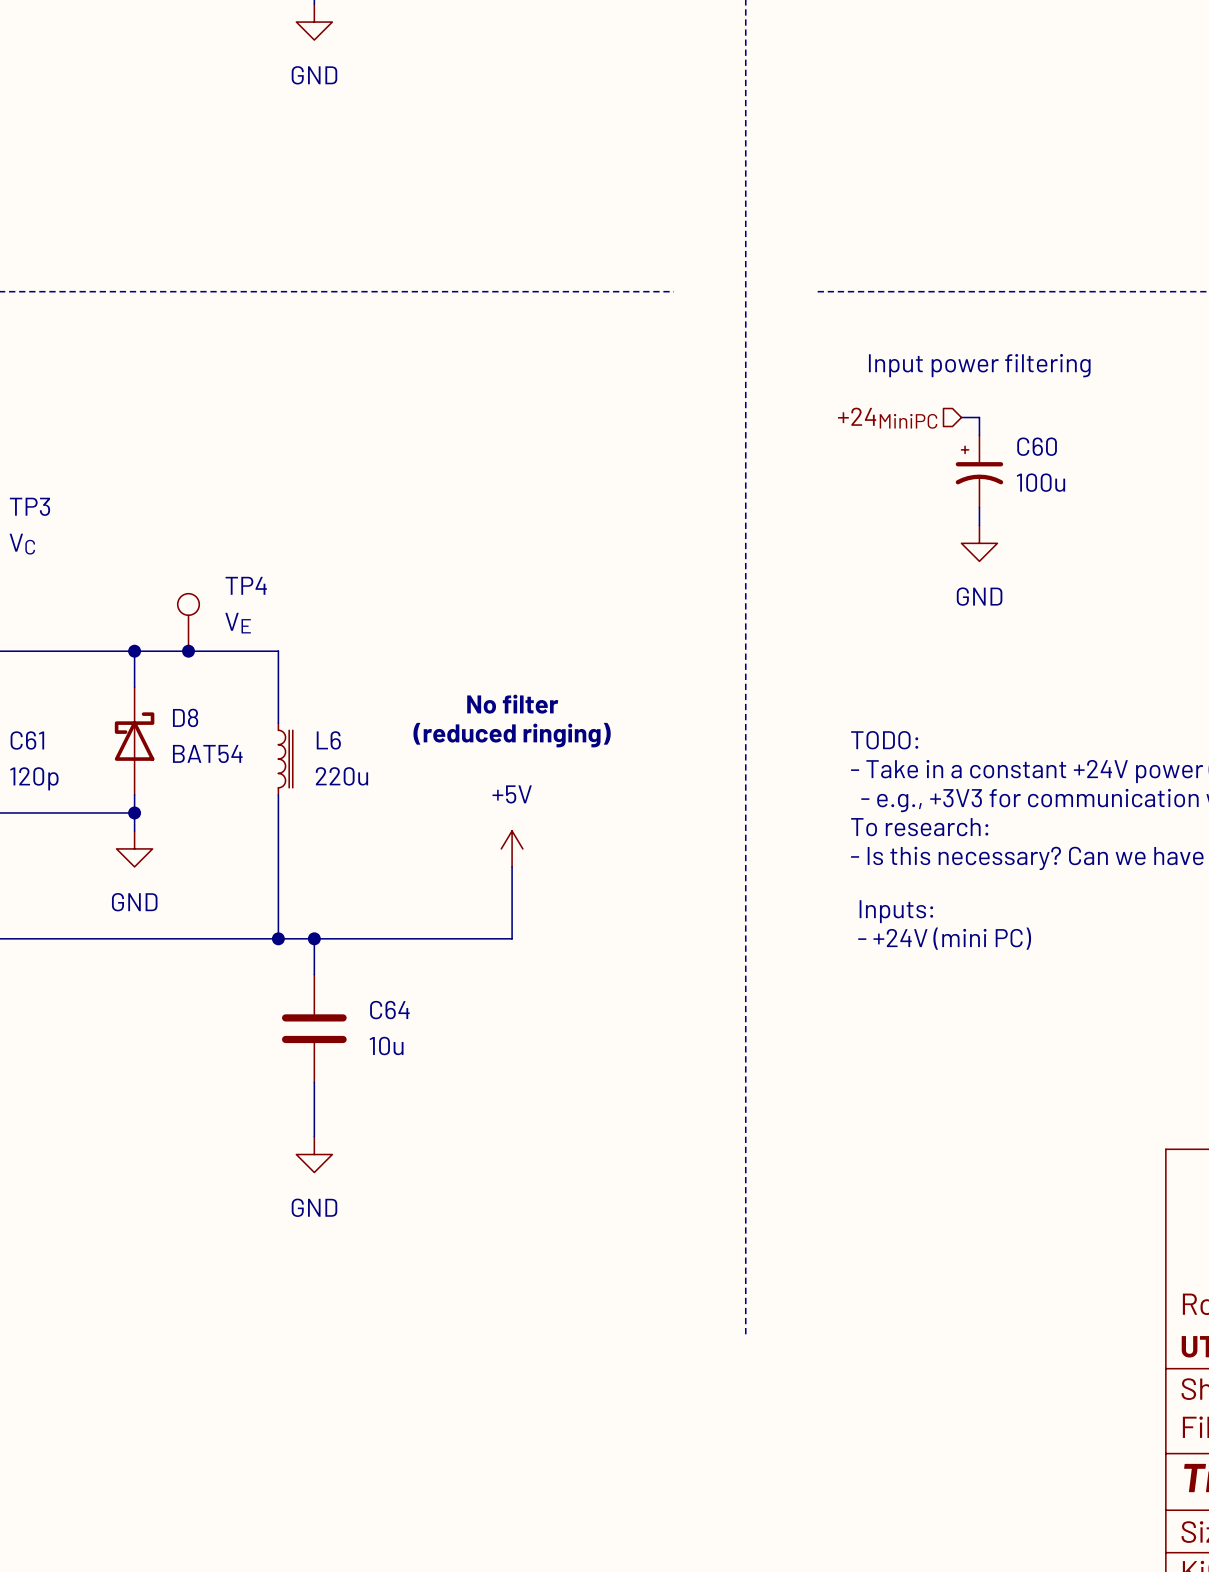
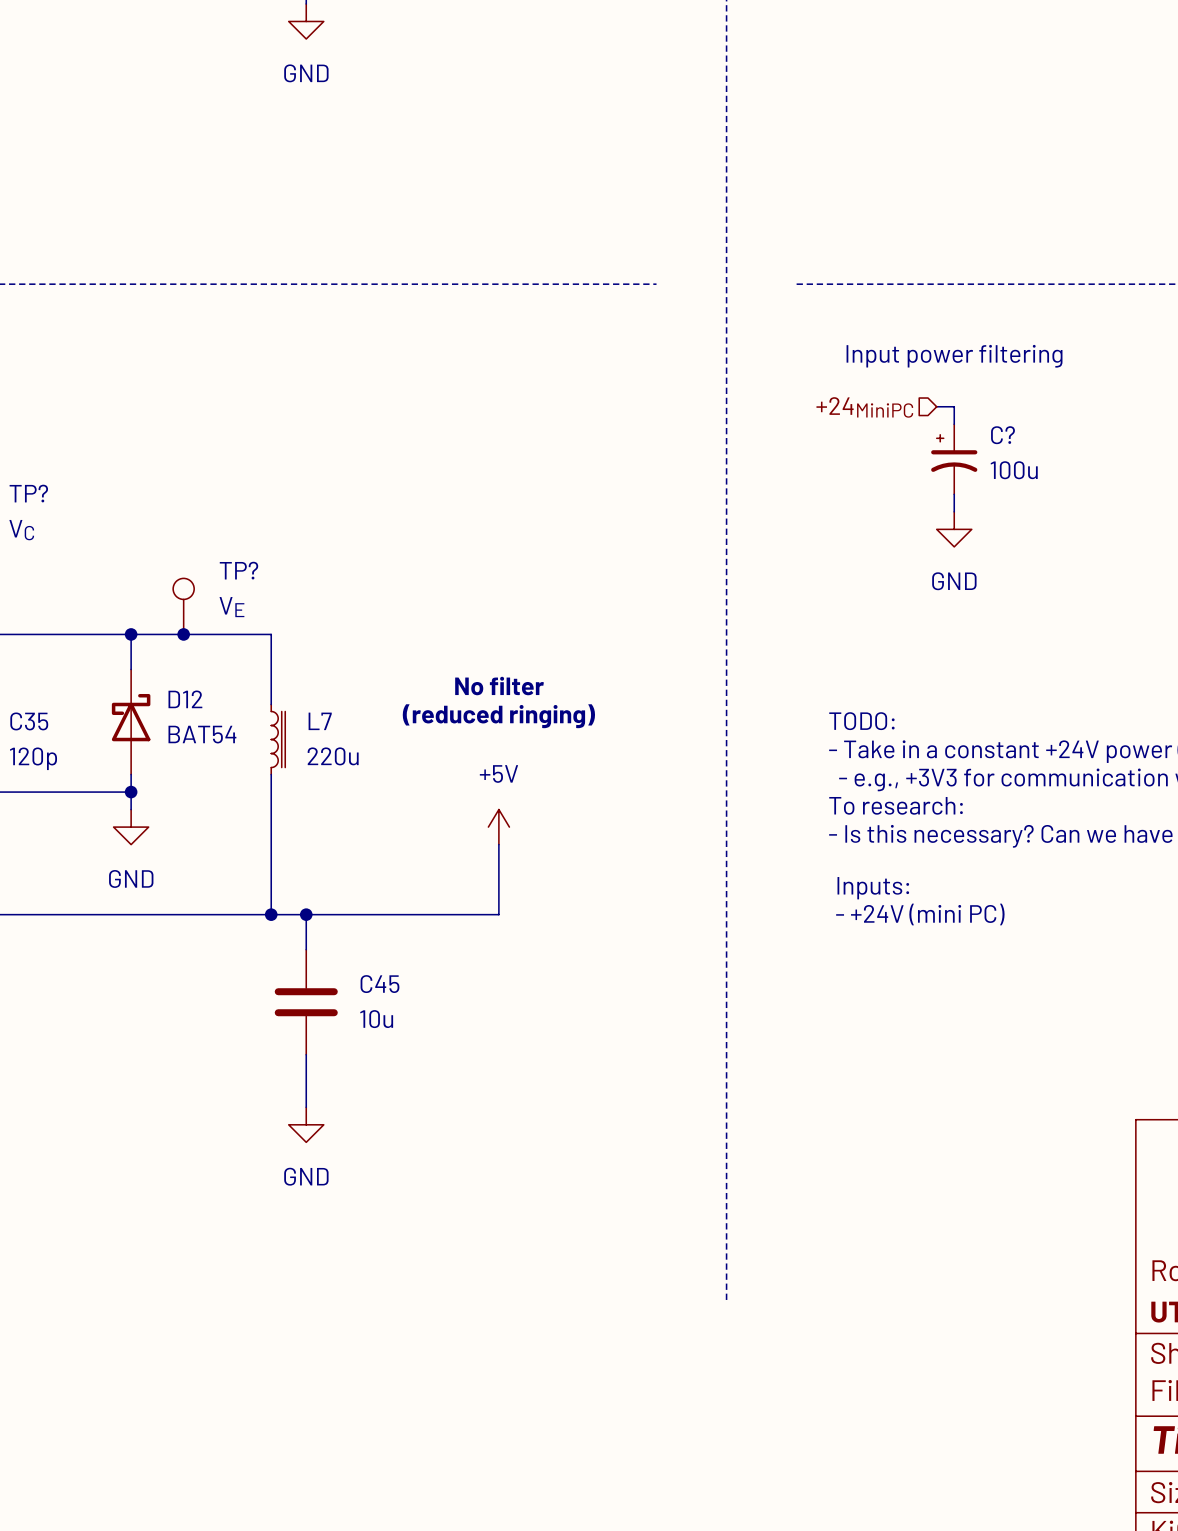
C60 name: C60 (1037, 446) -> C? (1002, 435)
TP3 name: TP3 (29, 506) -> TP? (28, 493)
TP4 name: TP4 (246, 585) -> TP? (238, 570)
D8 name: D8 (185, 717) -> D12 (185, 699)
C61 name: C61 (27, 740) -> C35 (29, 721)
L6 name: L6 (328, 740) -> L7 (320, 721)
C64 name: C64 (389, 1010) -> C45 (379, 984)

